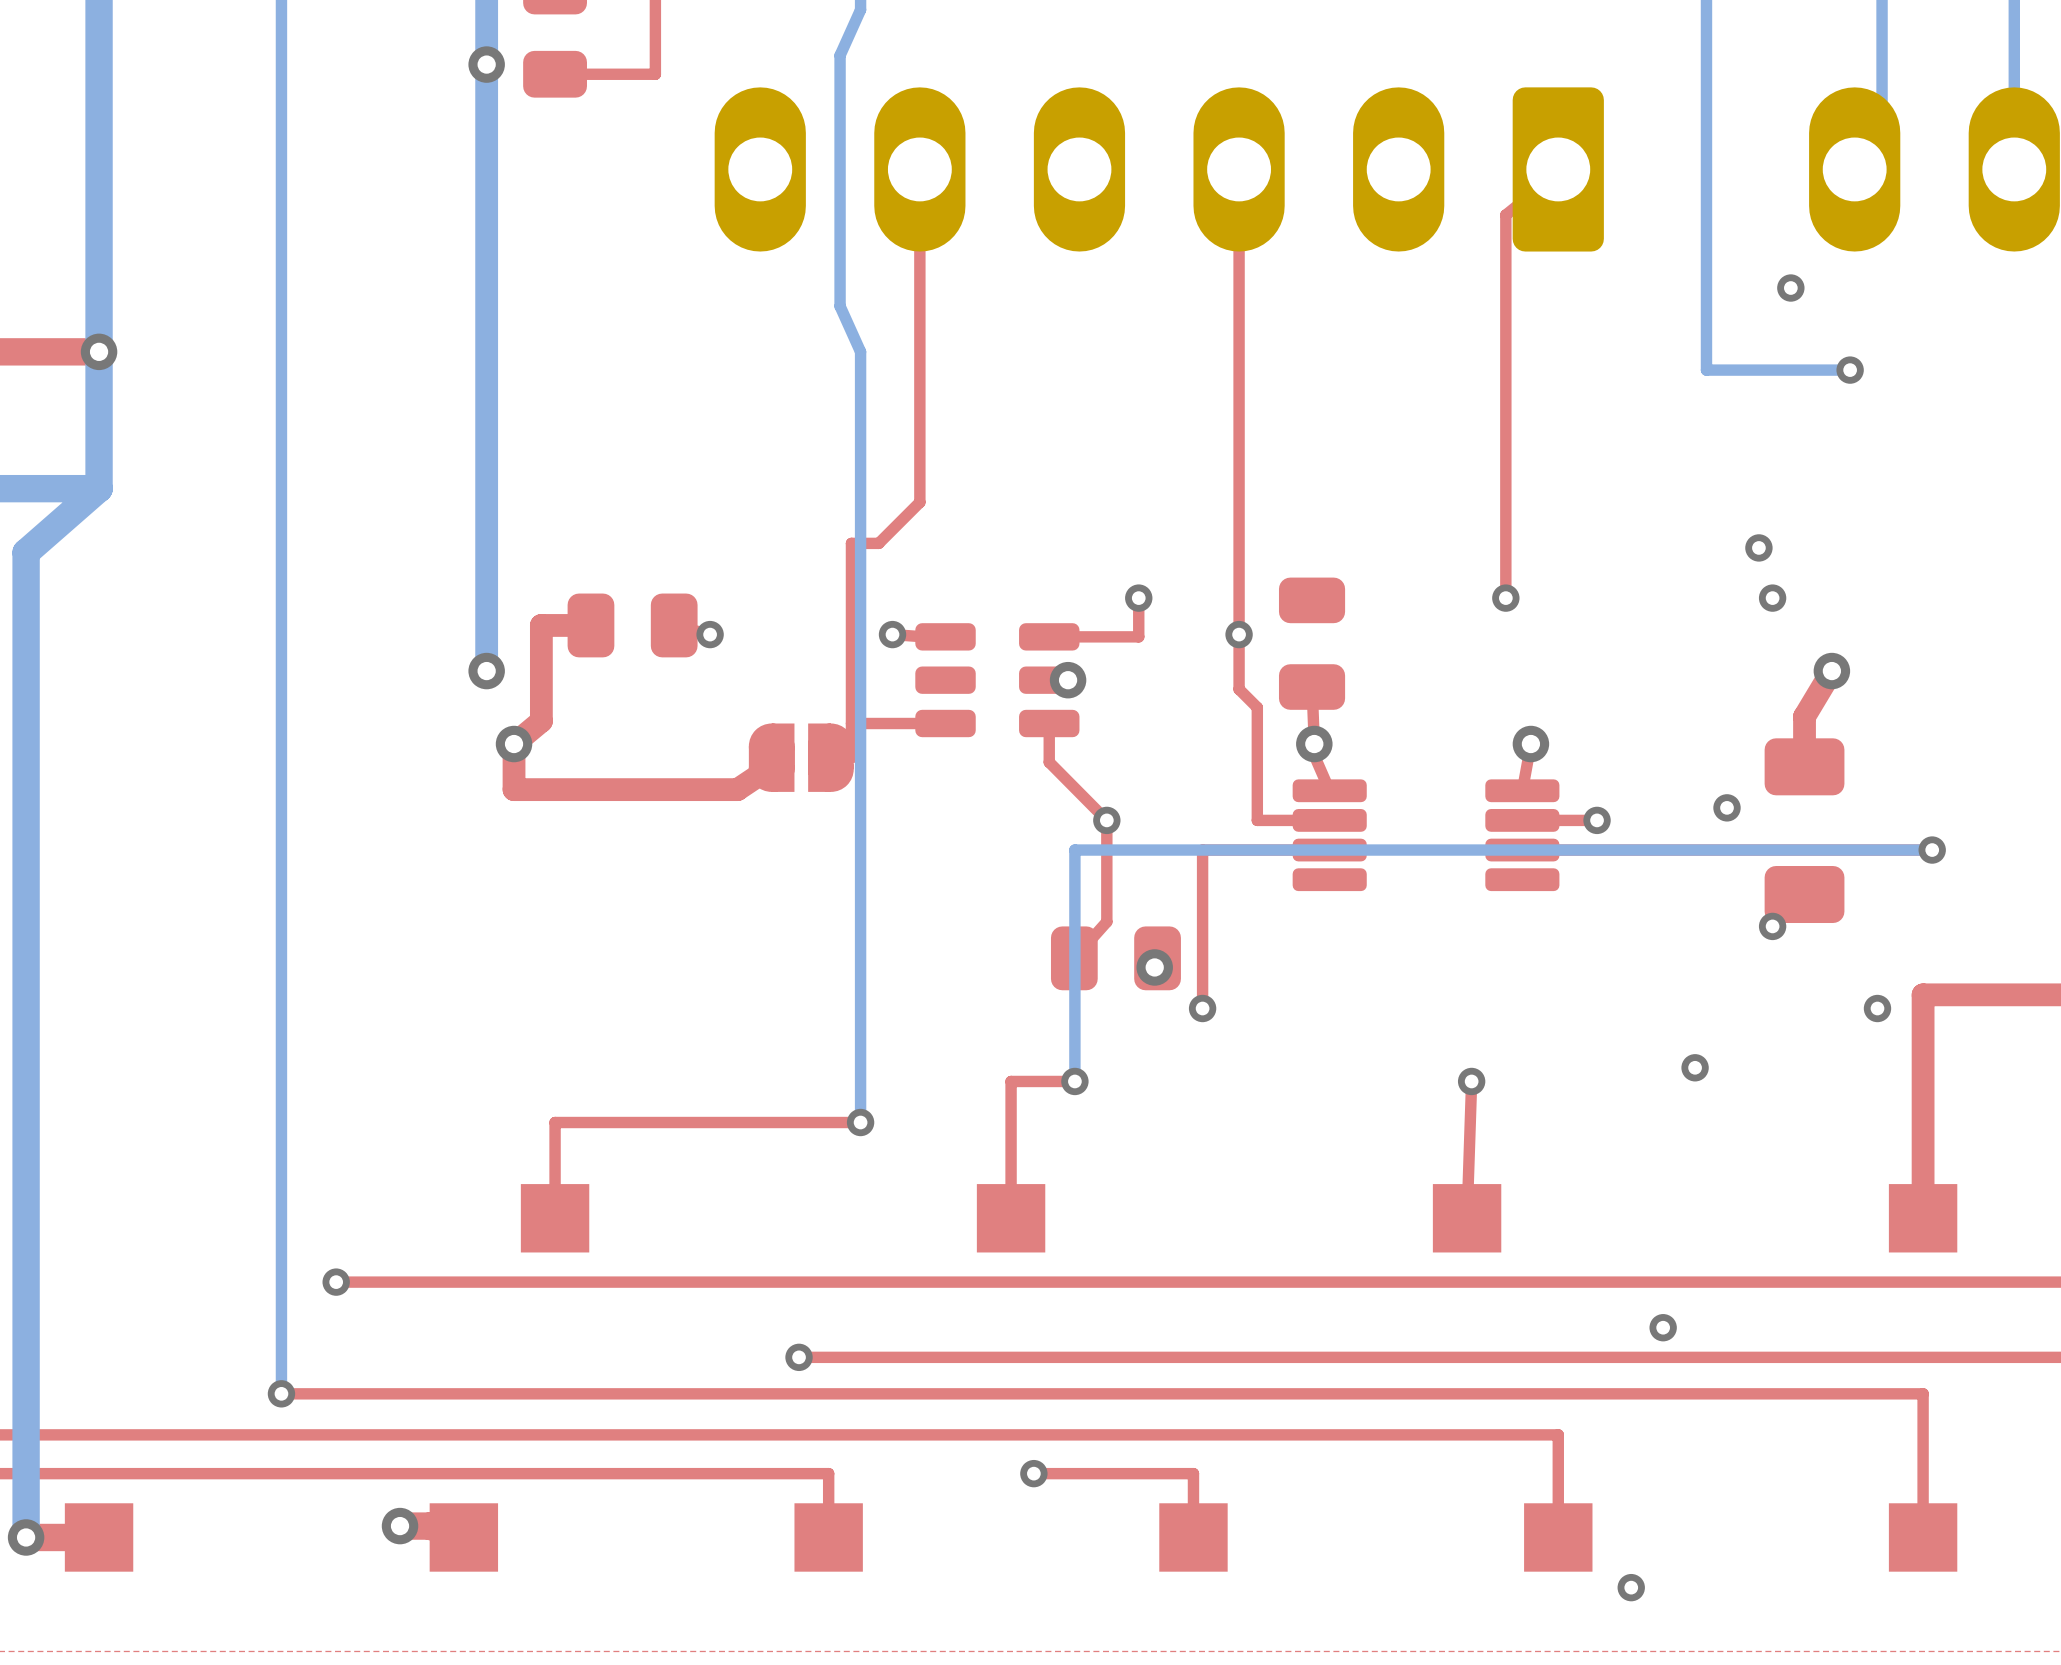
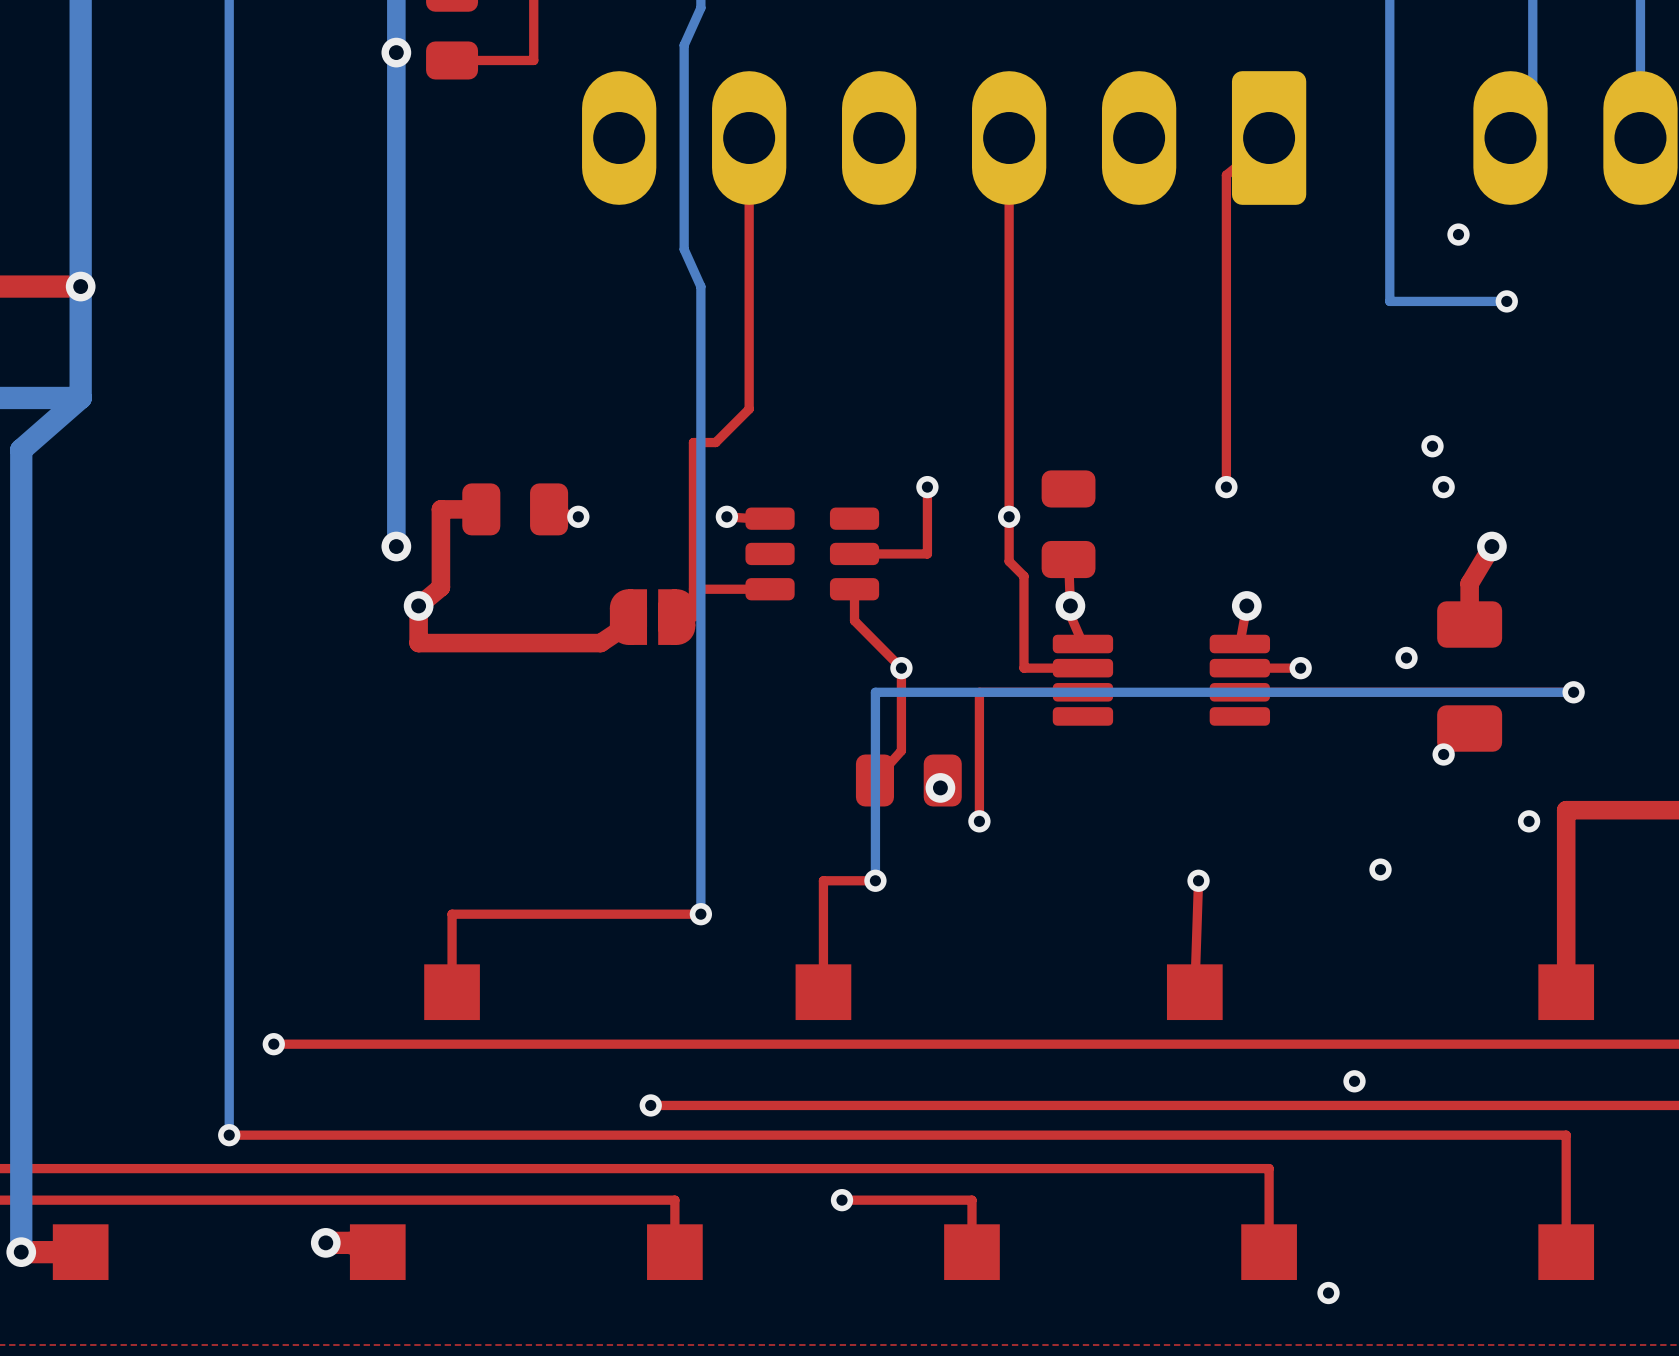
top track: (1138, 636) (1049, 636) -> (927, 518) (927, 553) (869, 553)
via: (1068, 680) -> none

